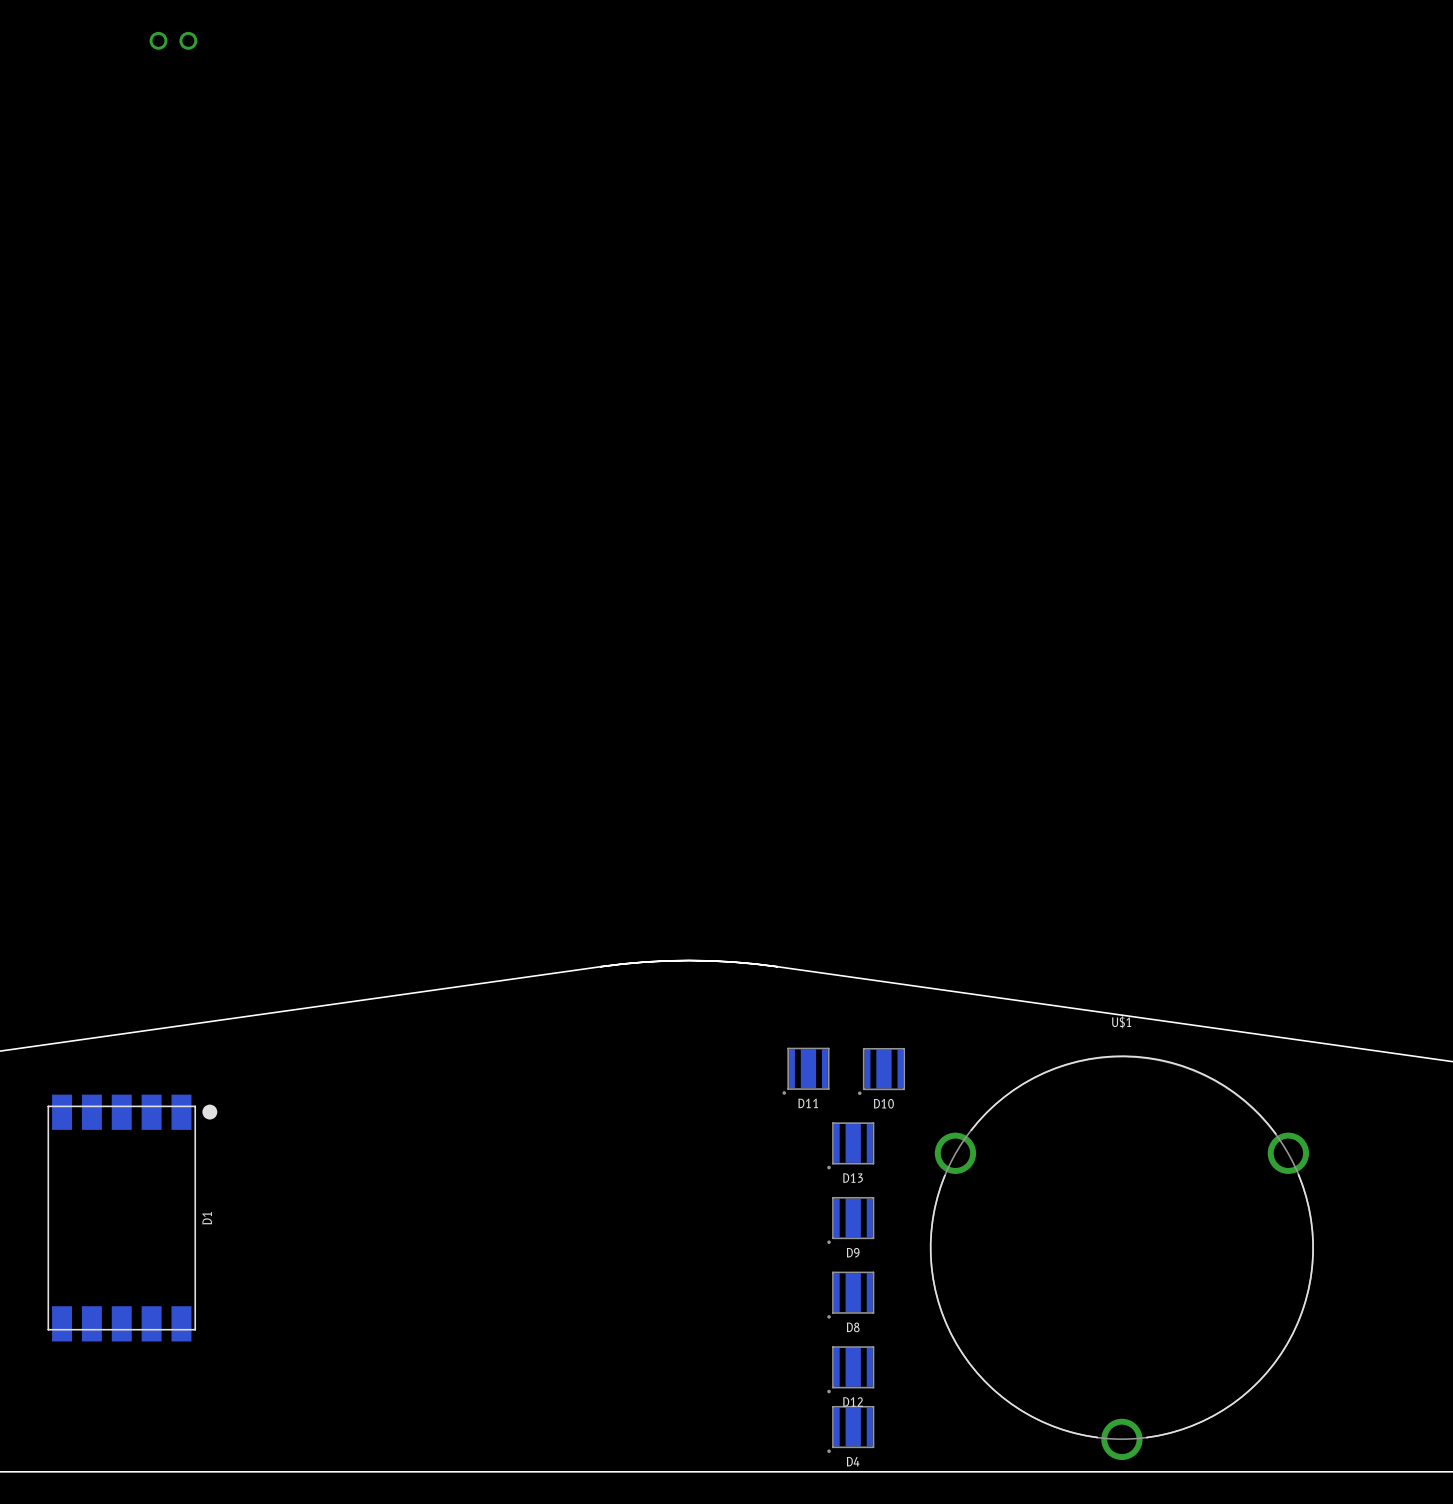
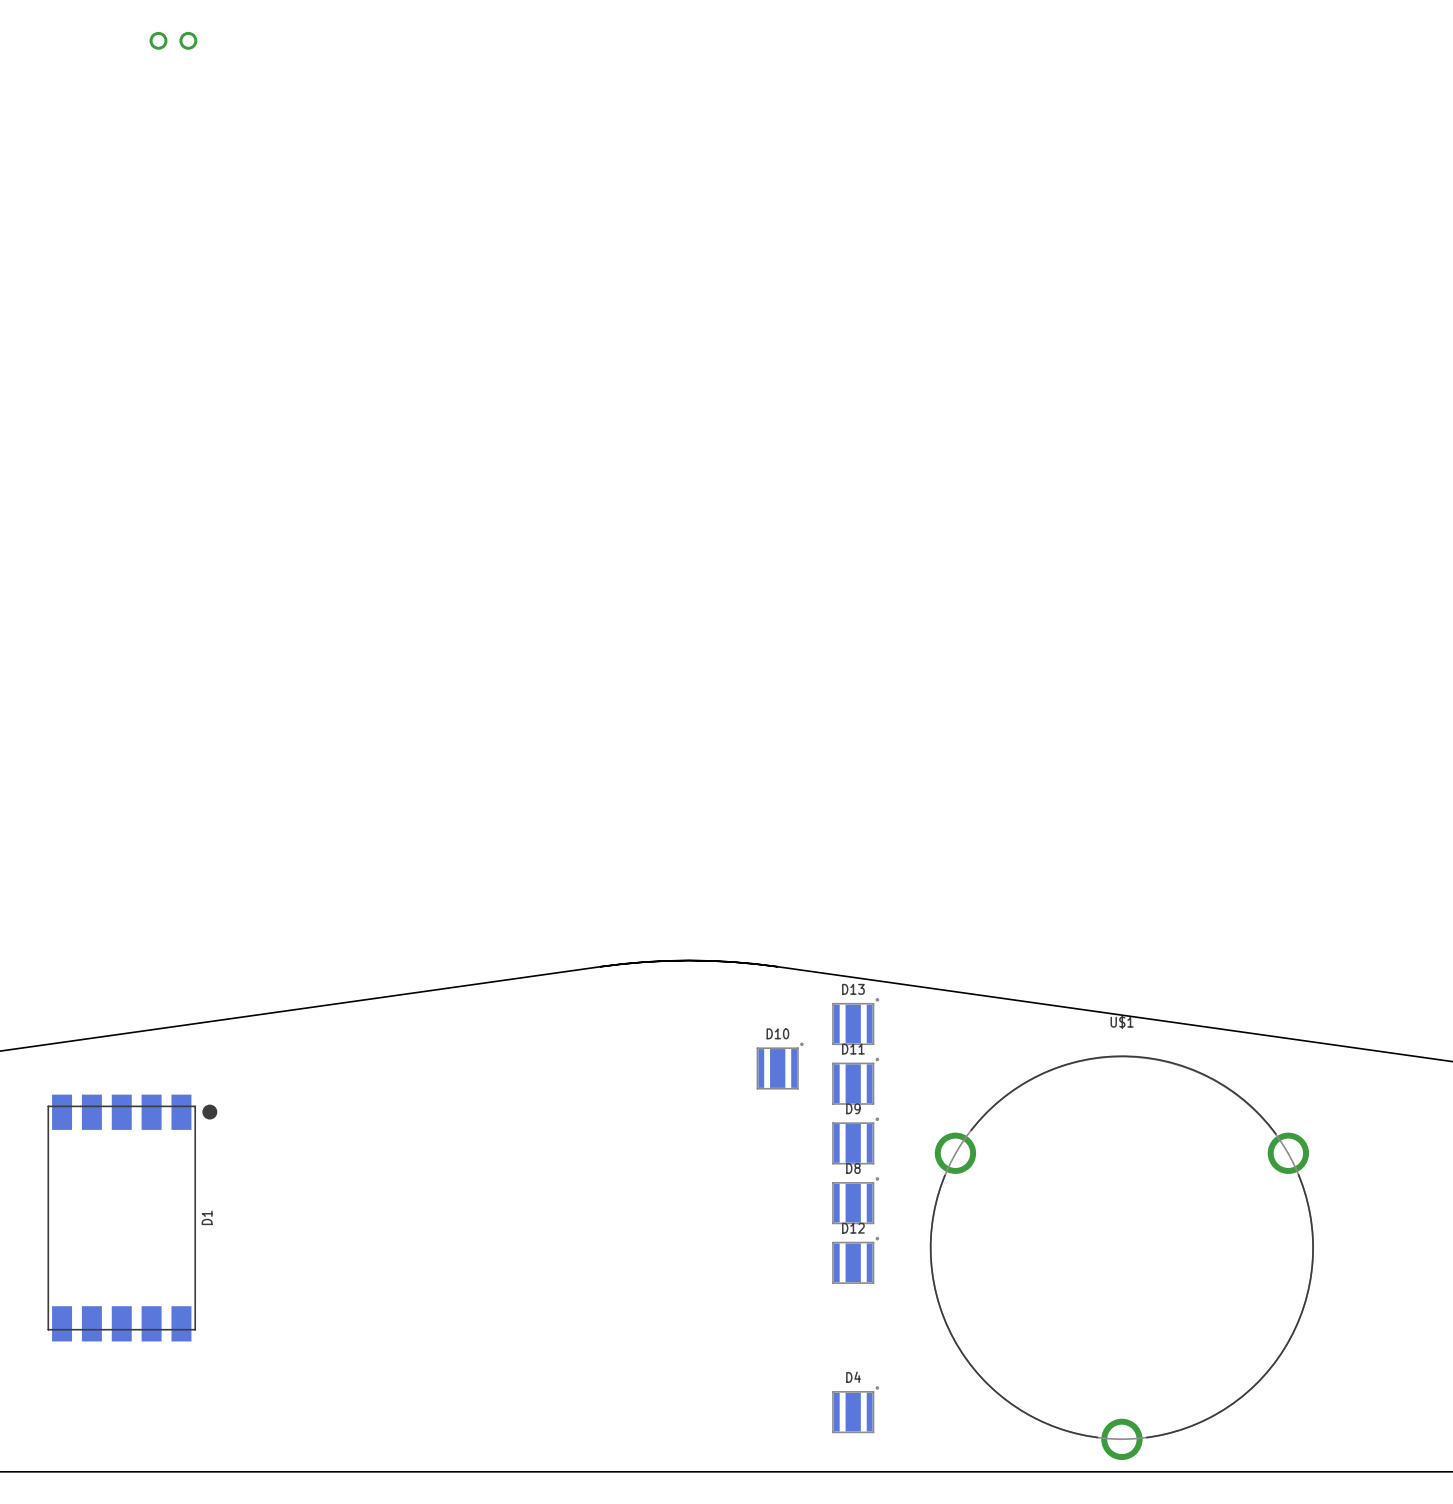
D11 rotation: 0° (805, 1071) -> 180° (855, 1081)
D11 position: (805, 1071) -> (855, 1081)
D10 rotation: 0° (881, 1071) -> 180° (780, 1066)
D10 position: (881, 1071) -> (780, 1066)
D13 rotation: 0° (850, 1145) -> 180° (855, 1021)
D13 position: (850, 1145) -> (855, 1021)
D9 rotation: 0° (850, 1220) -> 180° (855, 1140)
D9 position: (850, 1220) -> (855, 1140)
D8 rotation: 0° (850, 1295) -> 180° (855, 1200)
D8 position: (850, 1295) -> (855, 1200)
D12 rotation: 0° (850, 1369) -> 180° (855, 1260)
D12 position: (850, 1369) -> (855, 1260)
D4 rotation: 0° (850, 1429) -> 180° (855, 1409)

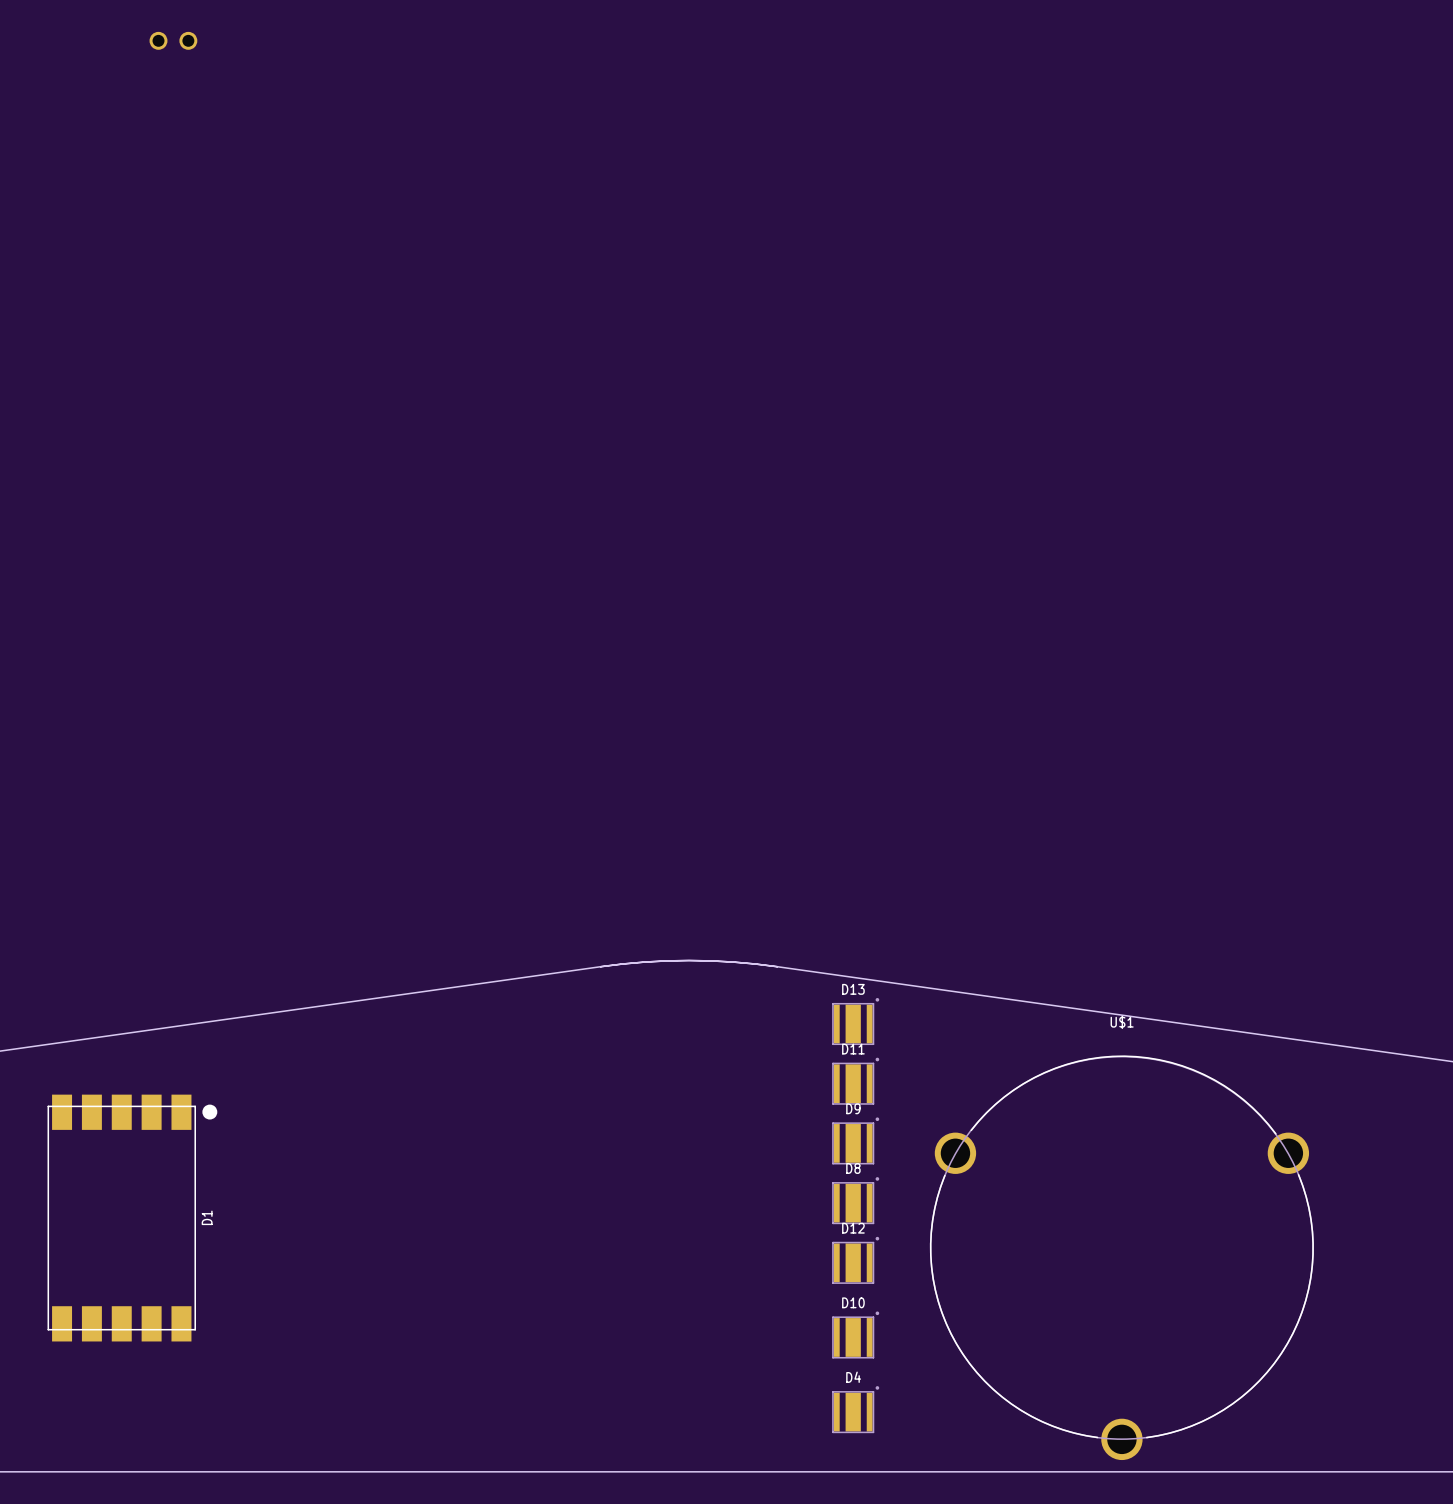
D10 position: (780, 1066) -> (855, 1335)

